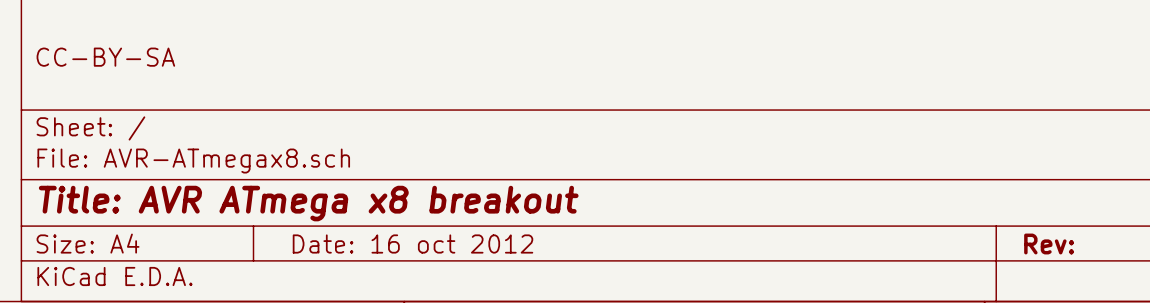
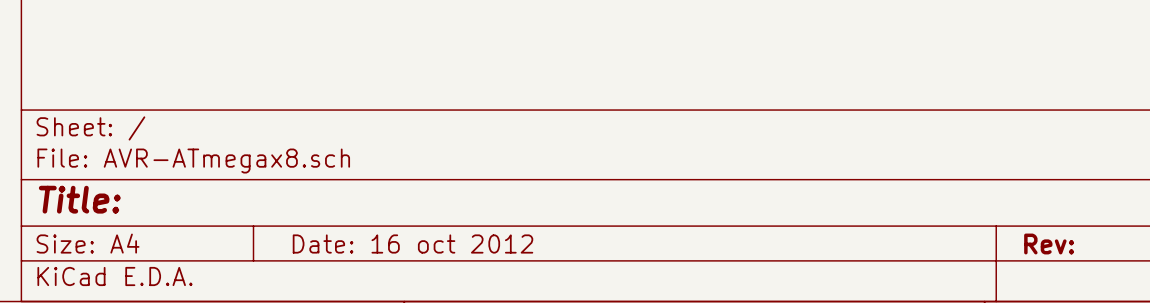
title block: CC-BY-SA (105, 57) -> none
title block: Title: AVR ATmega x8 breakout (308, 203) -> Title: (79, 199)

